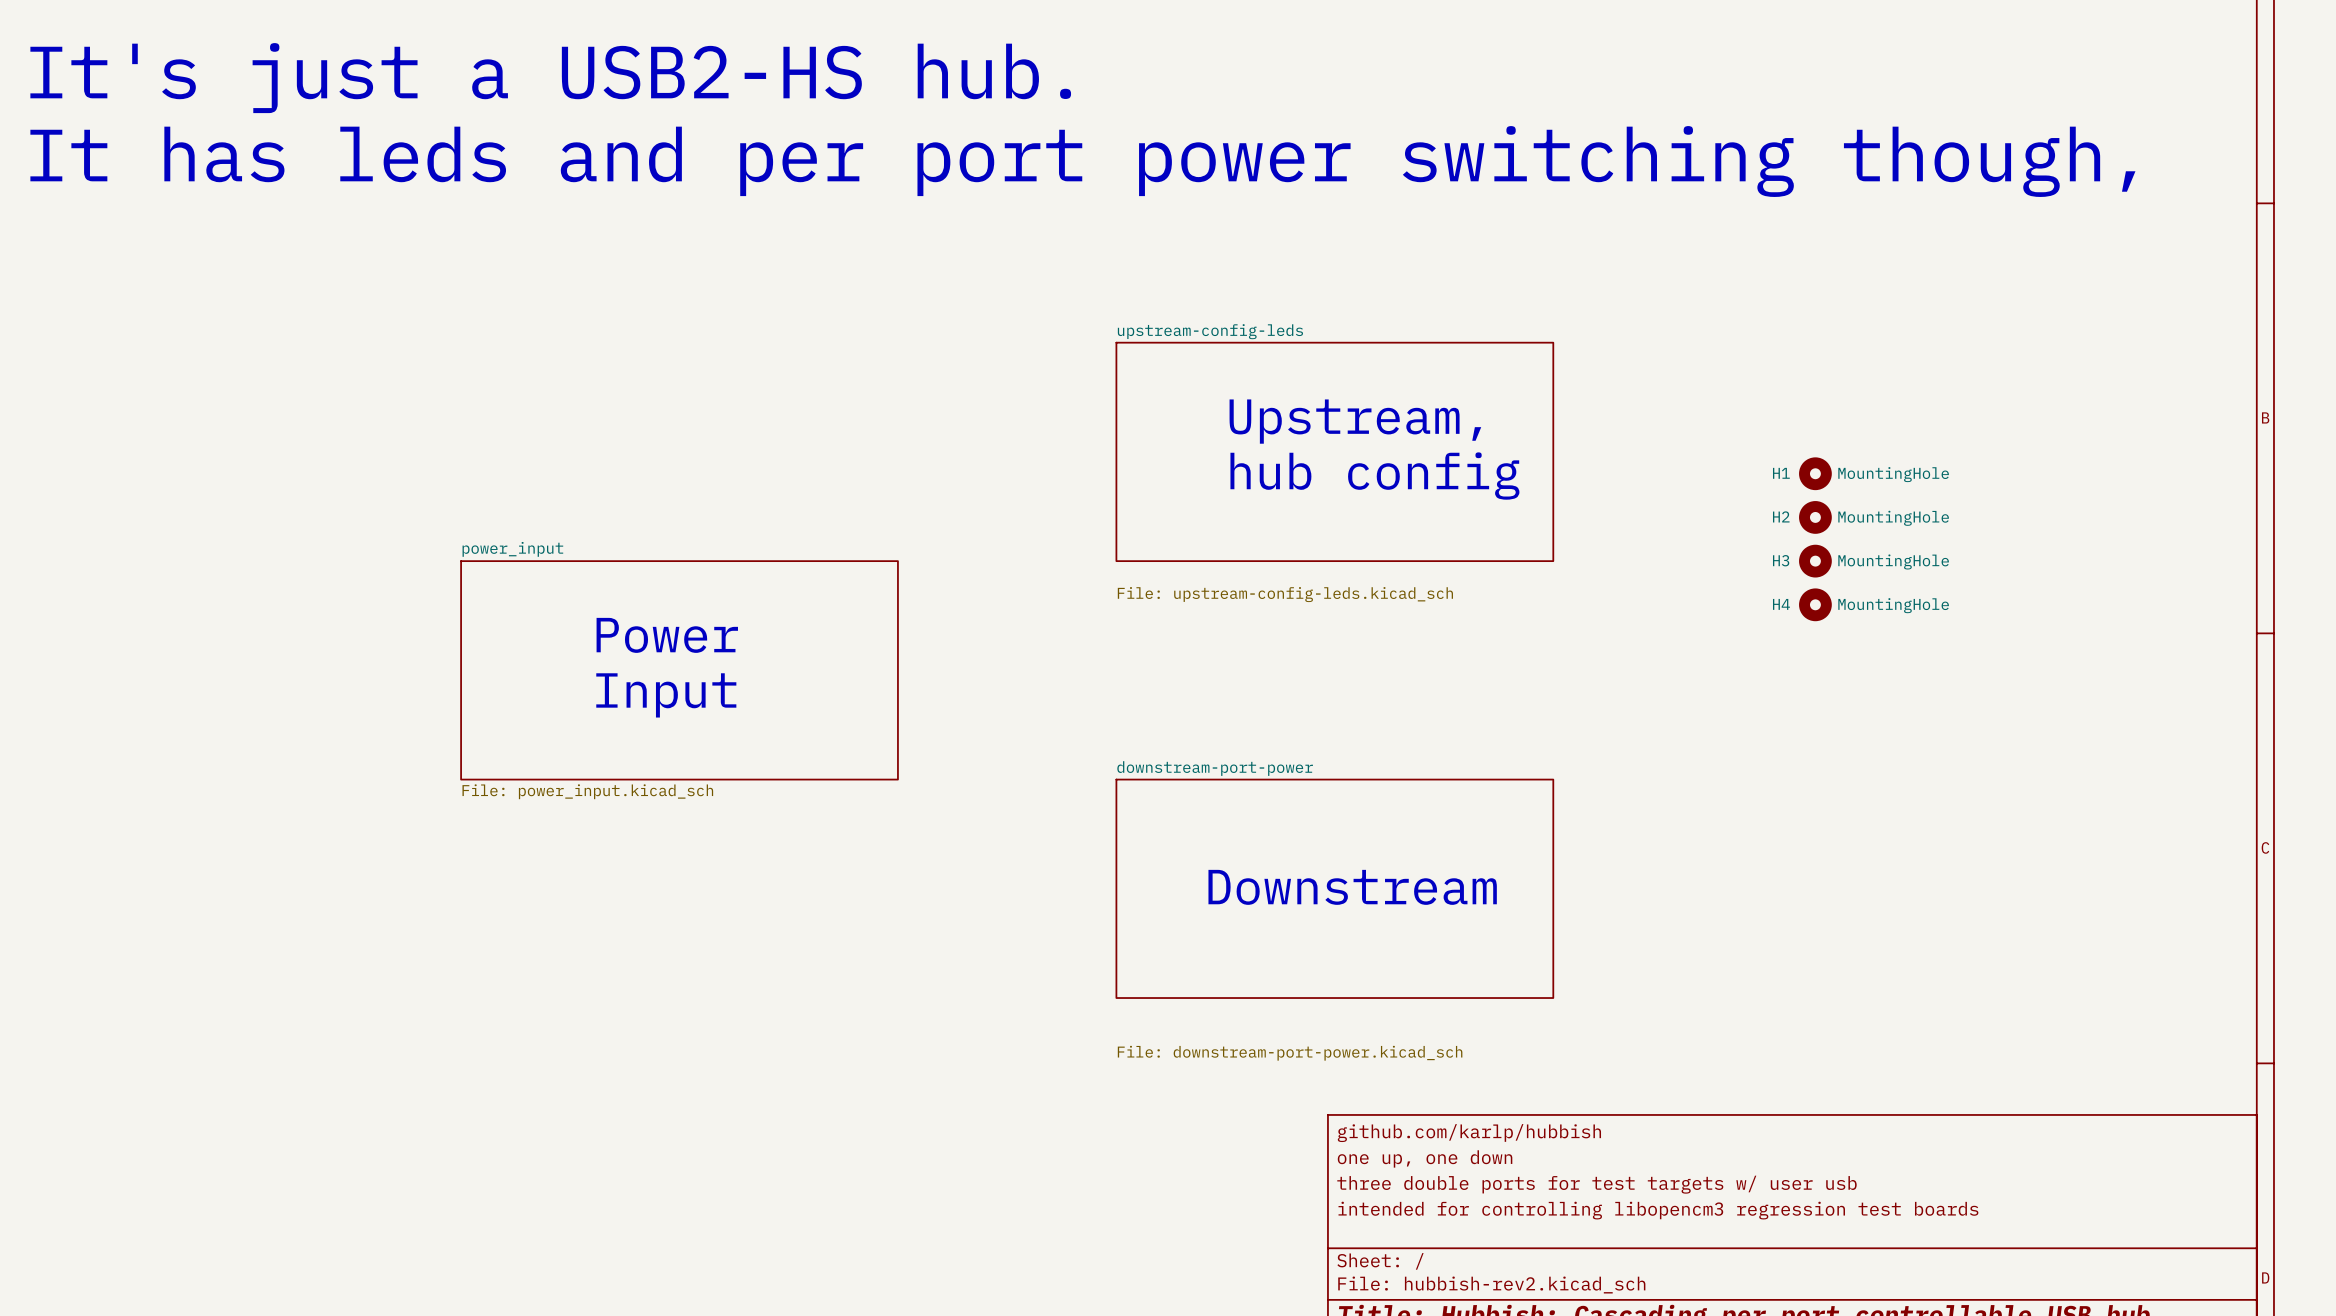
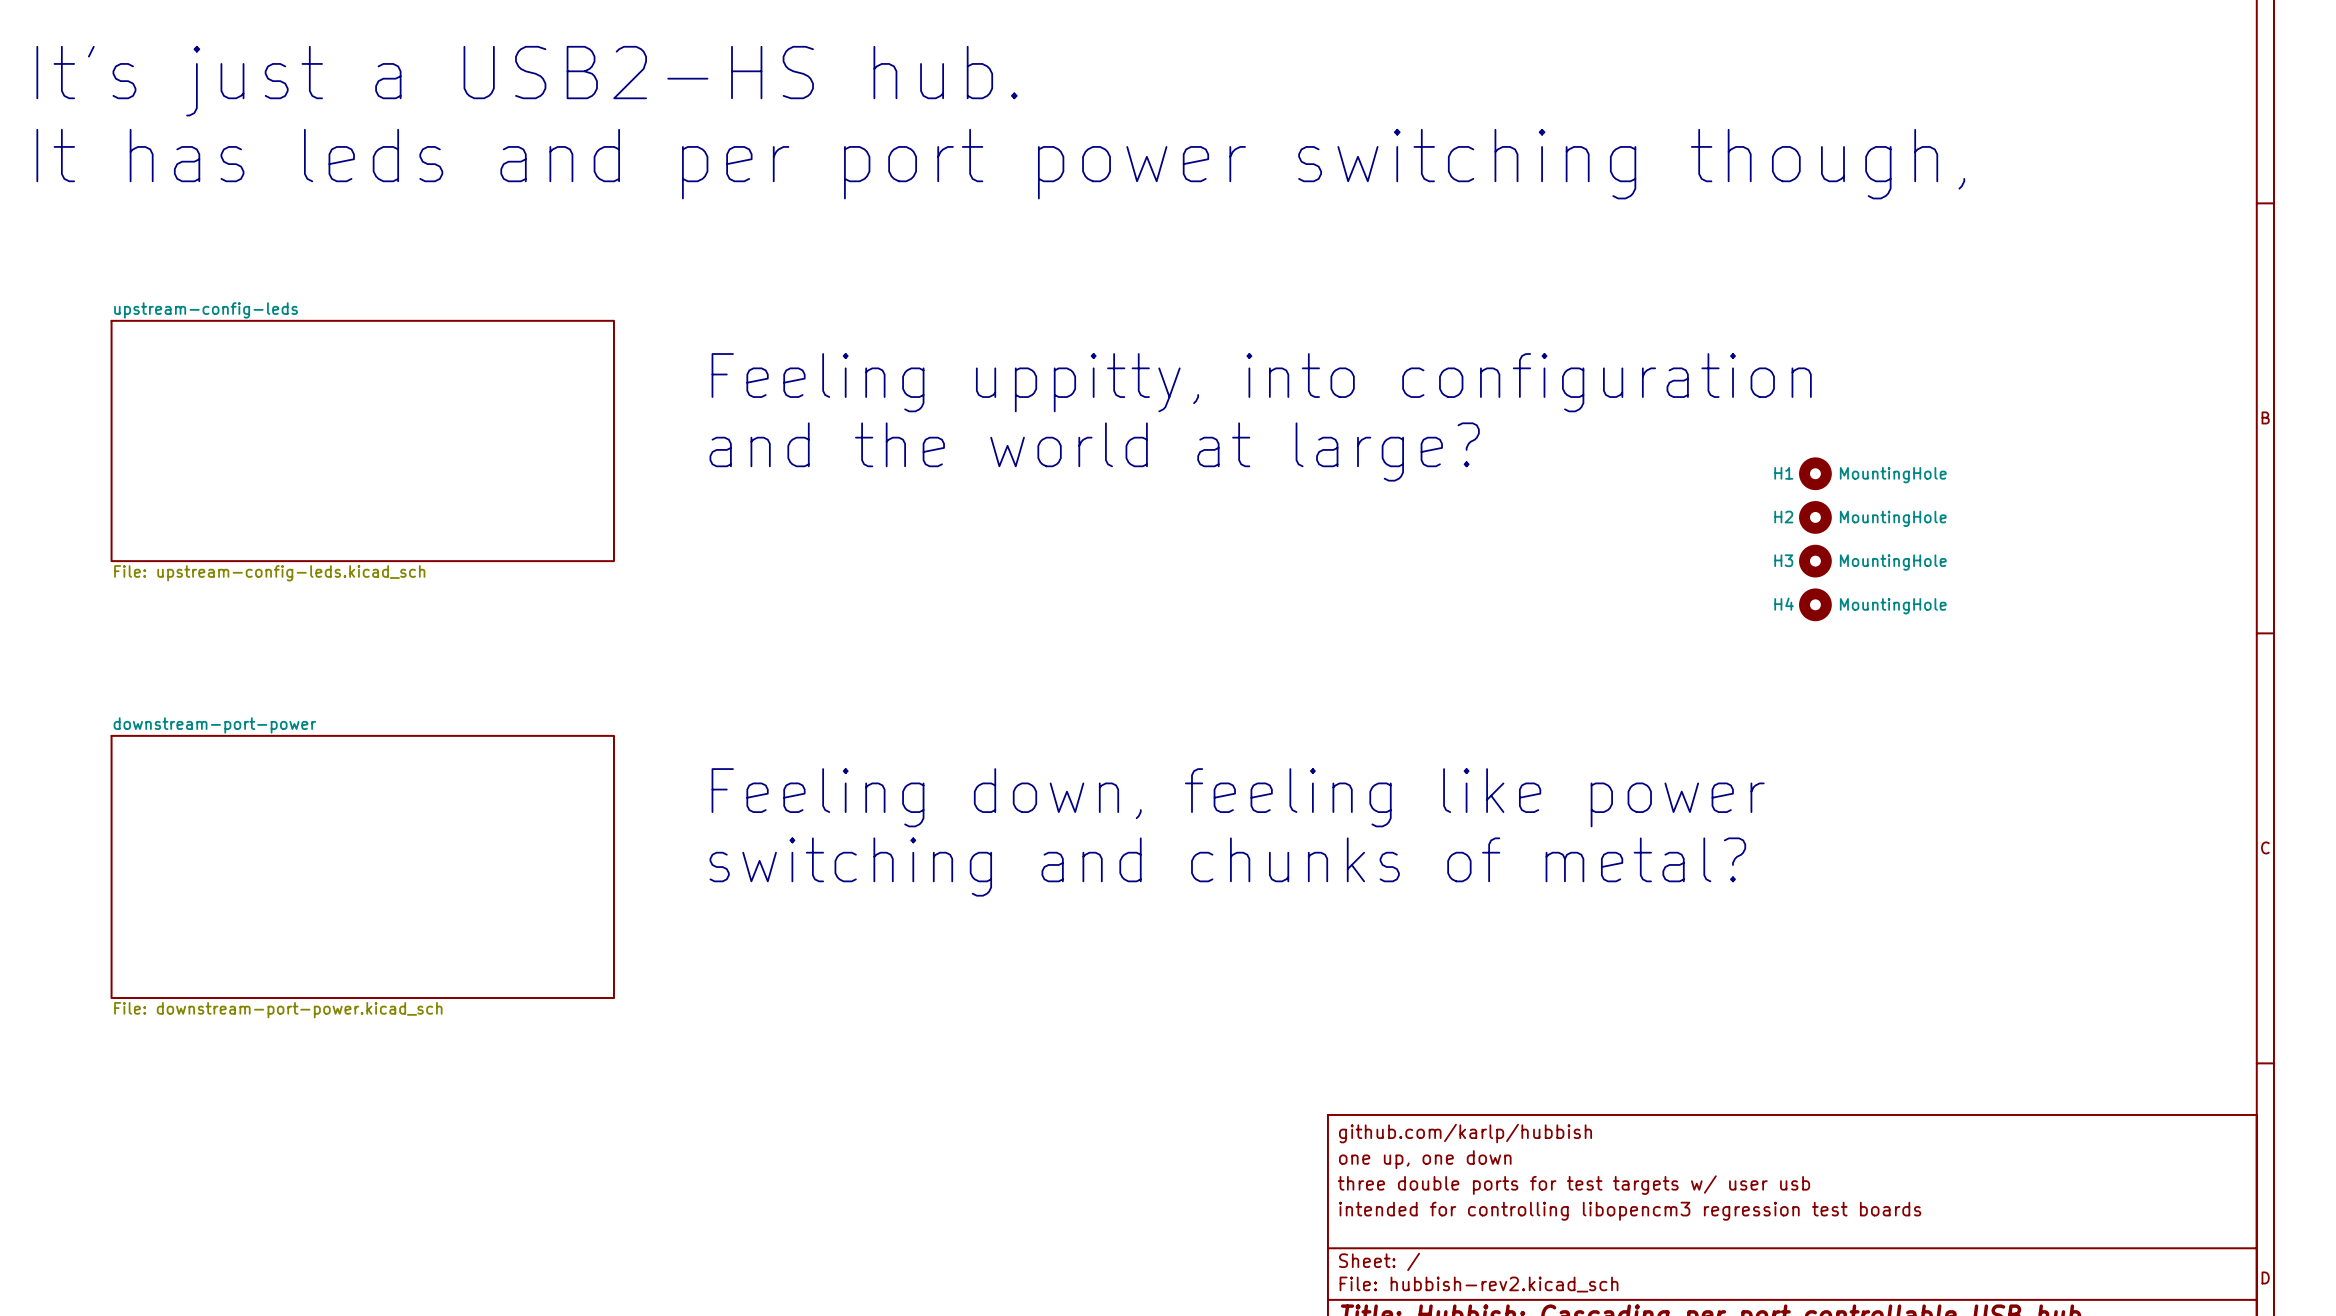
text: none -> Feeling uppitty, into configuration (1261, 382)
text: Upstream, (1355, 421) -> none
sheet upstream-config-leds: none -> File: upstream-config-leds.kicad_sch (362, 440)
text: none -> and the world at large? (1094, 451)
sheet upstream-config-leds: File: upstream-config-leds.kicad_sch (1334, 451) -> none
text: hub config (1374, 476) -> none
text: Power (667, 635) -> none
sheet power_input: File: power_input.kicad_sch (679, 670) -> none
text: Input (666, 695) -> none
text: none -> Feeling down, feeling like power (1238, 797)
text: none -> switching and chunks of metal? (1227, 867)
sheet downstream-port-power: none -> File: downstream-port-power.kicad_sch (362, 866)
text: Downstream (1352, 887) -> none
sheet downstream-port-power: File: downstream-port-power.kicad_sch (1334, 888) -> none

